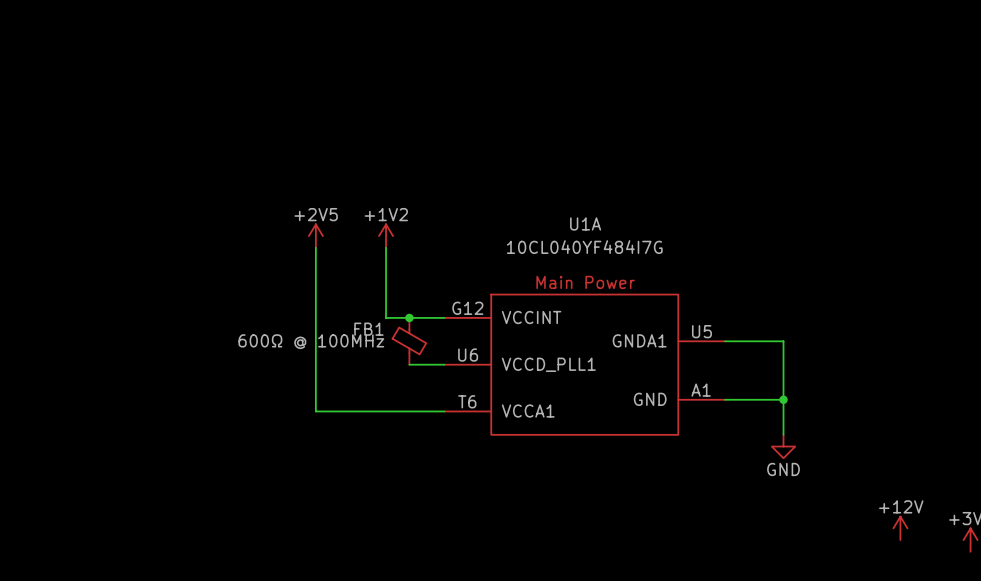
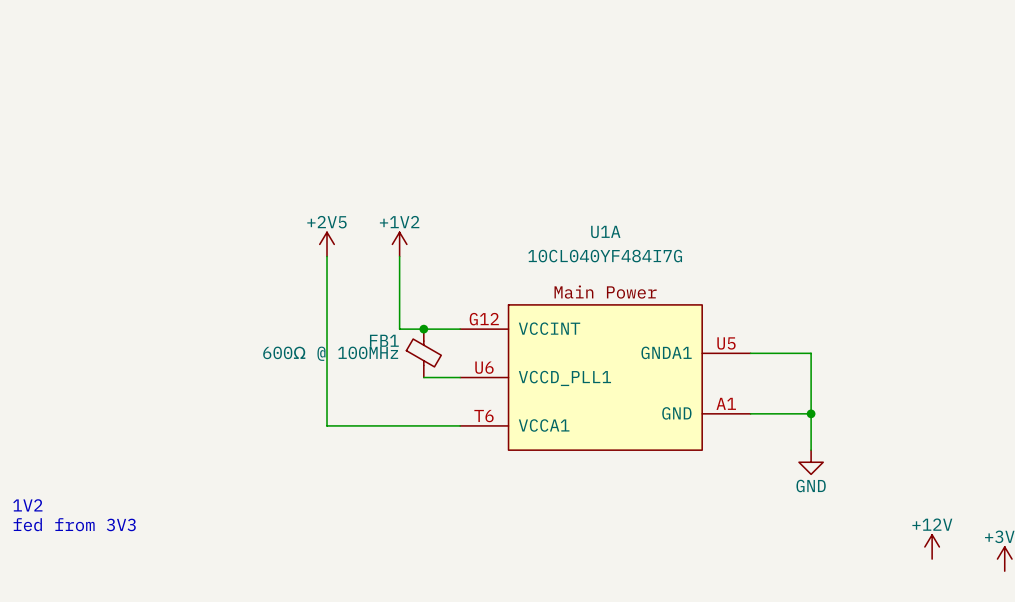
text: none -> 1V2 (27, 505)
text: none -> fed from 3V3 (74, 524)

